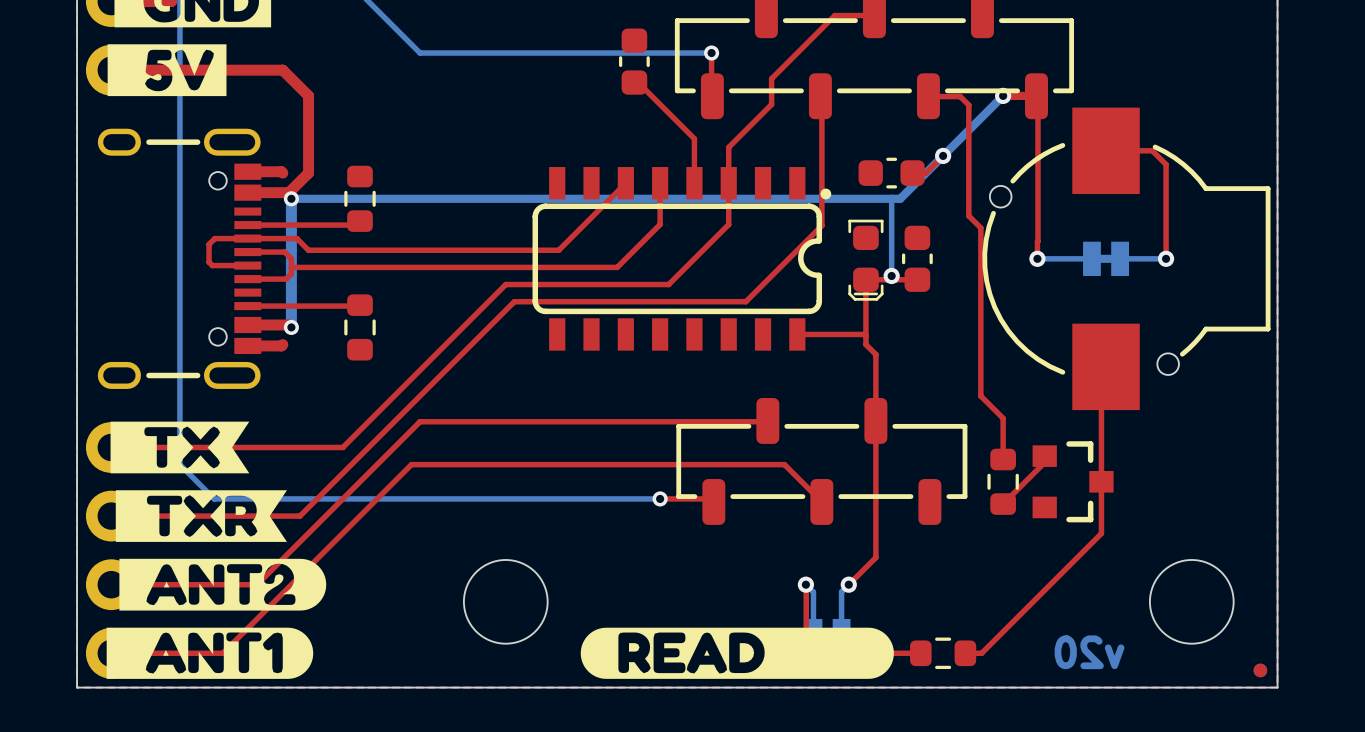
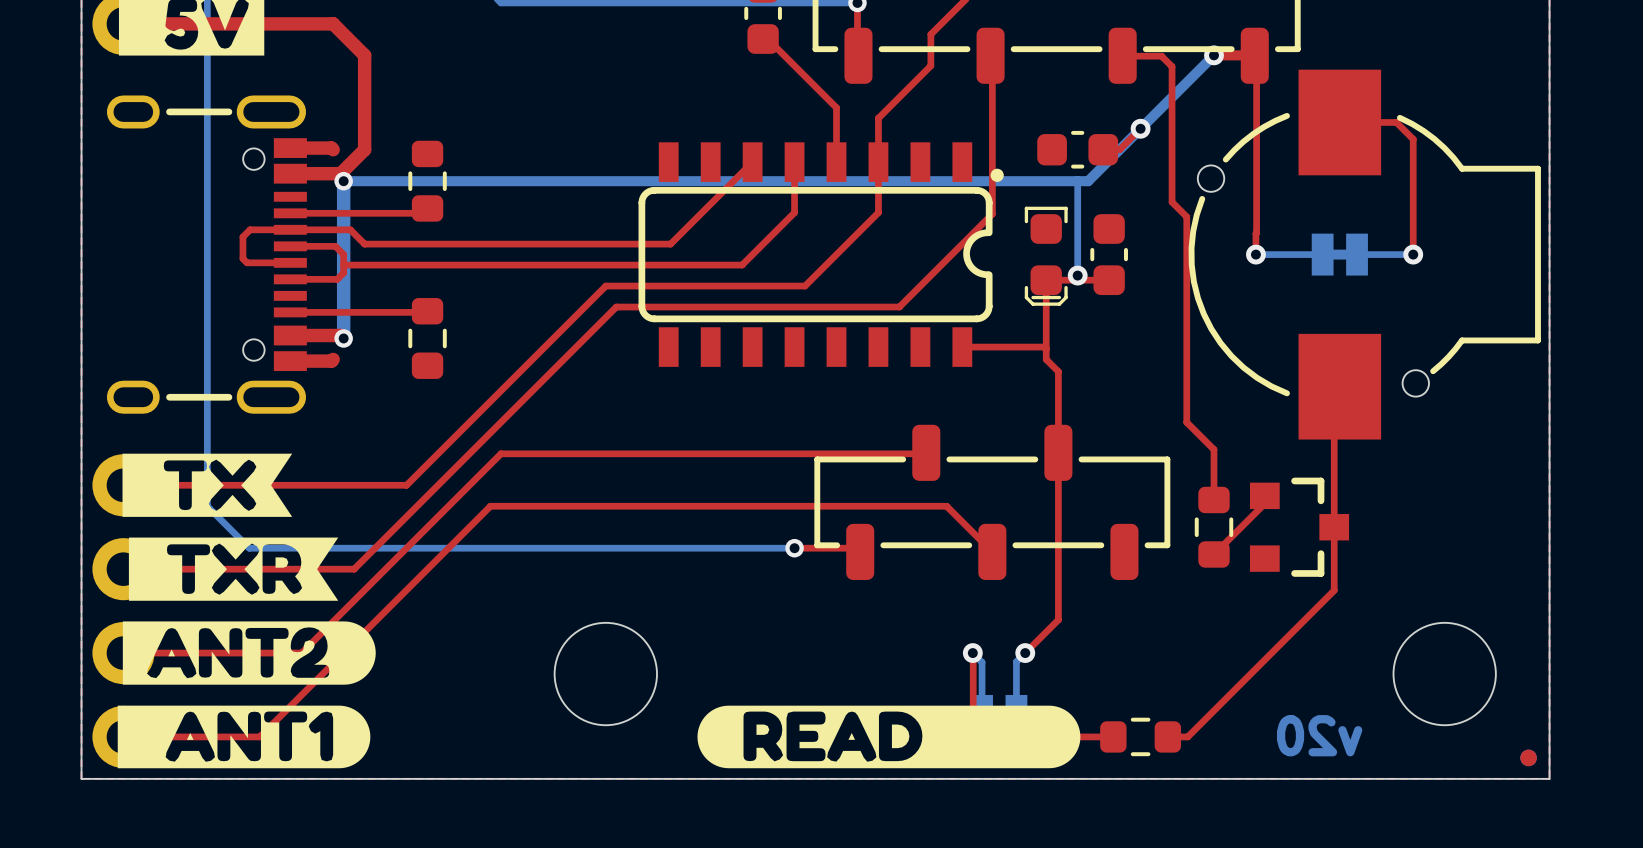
drawing shape: [119, 558, 327, 611] -> [122, 621, 376, 685]

